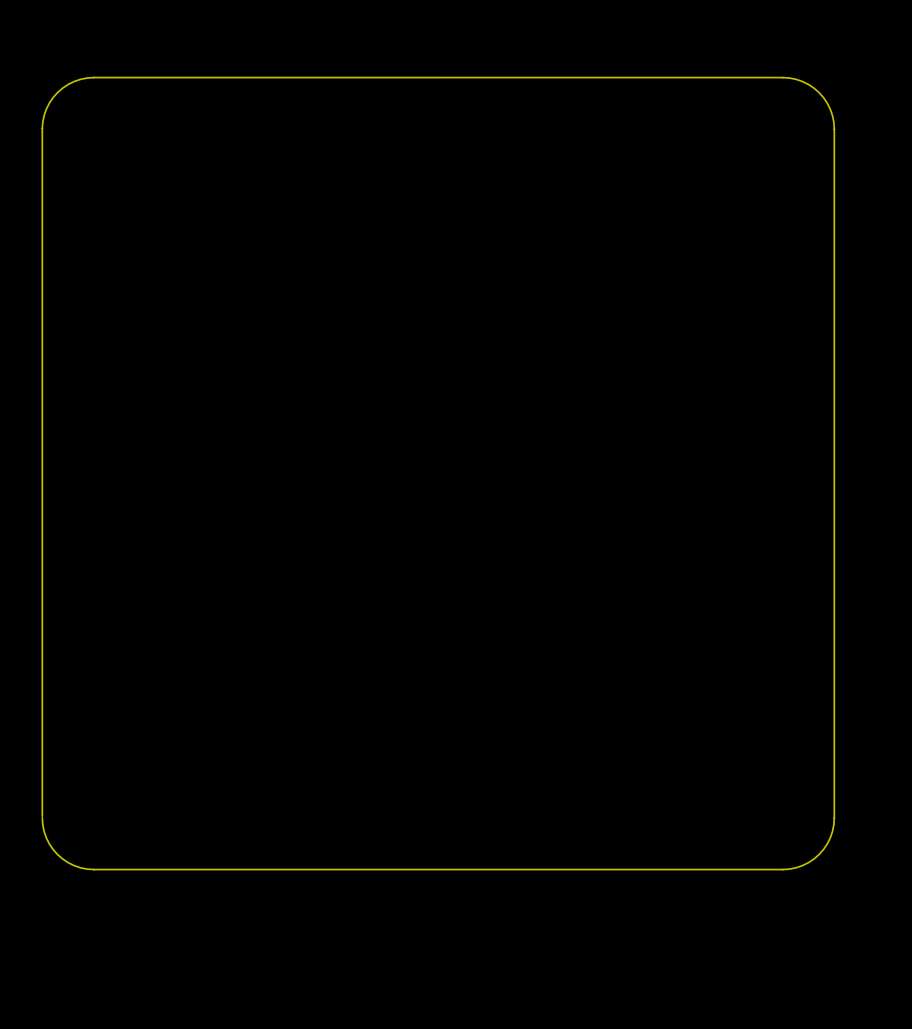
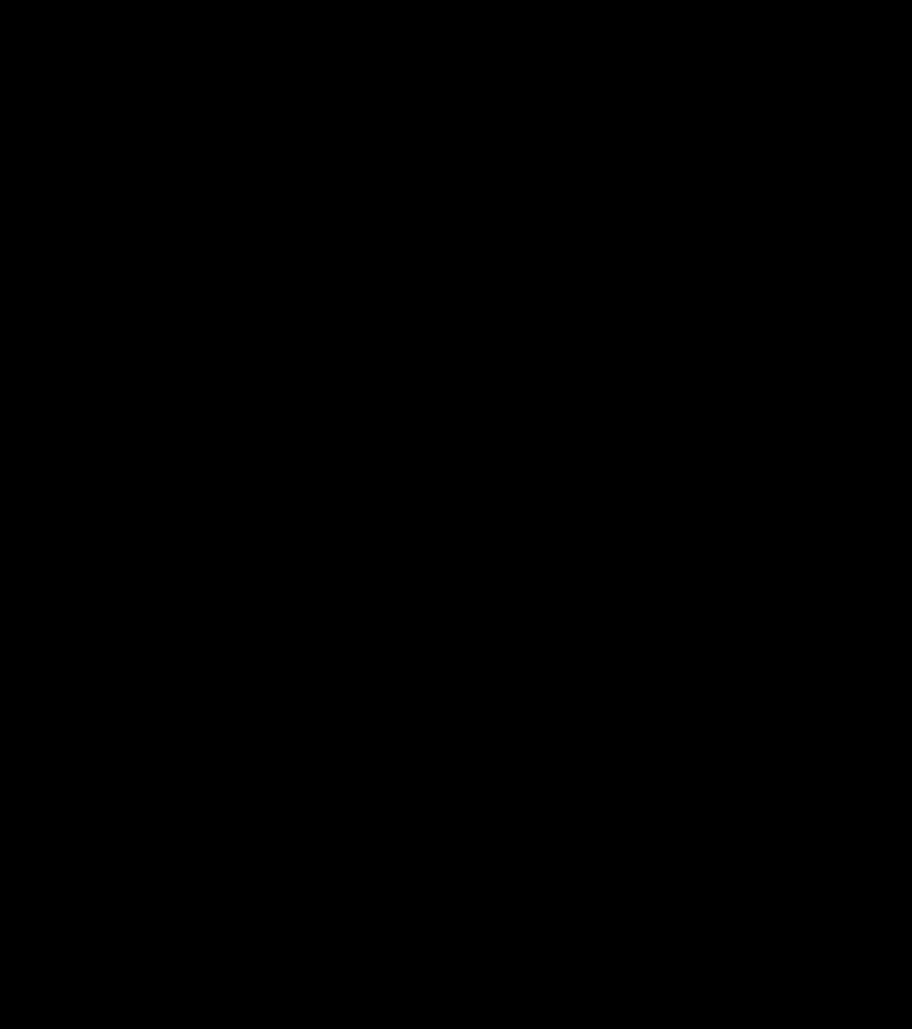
board edge: (42, 816) (42, 128) (46, 108) (57, 92) (74, 81) (93, 77) (782, 77) (802, 81) (819, 92) (830, 109) (834, 129) (834, 817) (830, 837) (819, 854) (802, 865) (782, 869) (93, 869) (74, 865) (57, 854) (46, 837) (42, 817) -> none

